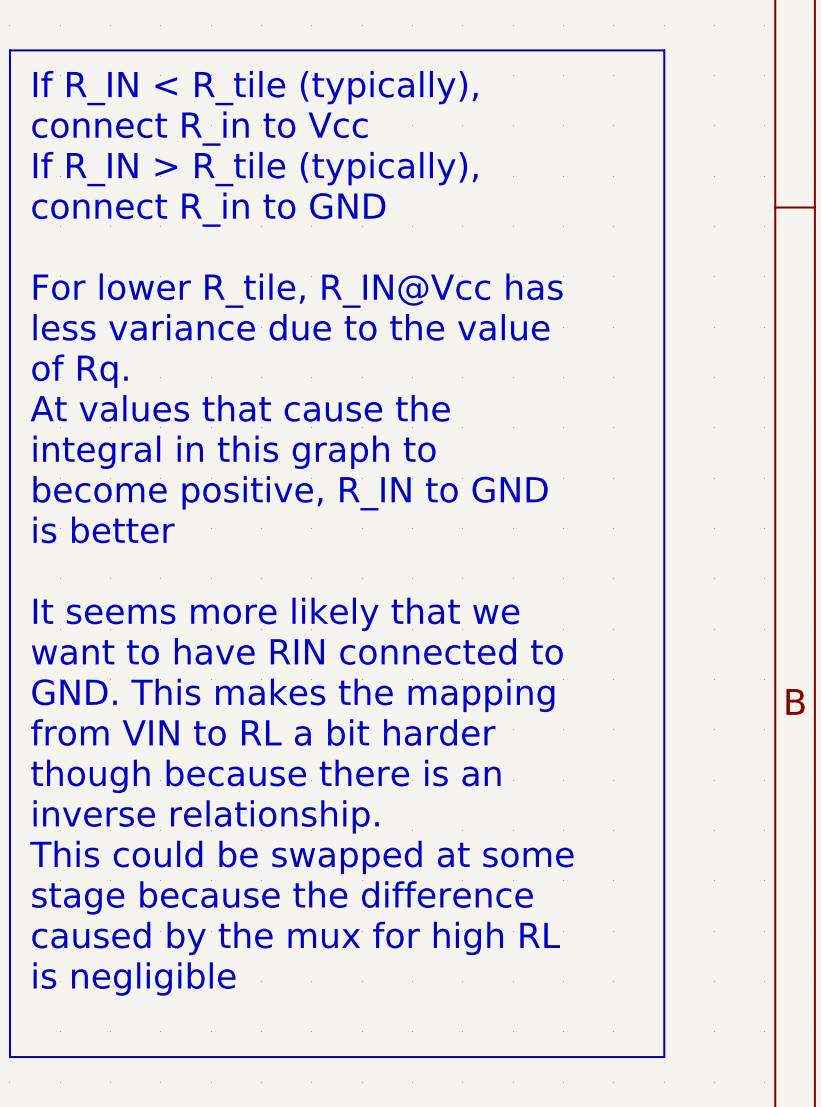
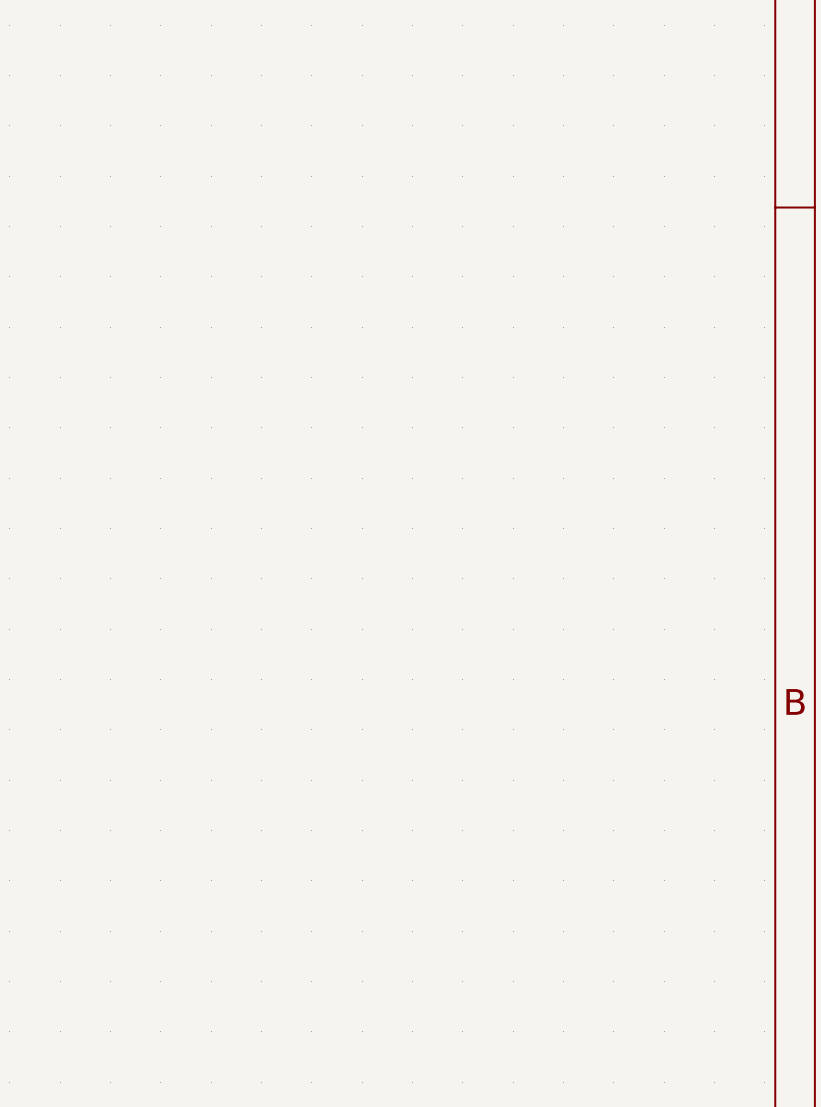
line: (9, 50) (664, 50) (664, 1057) (9, 1057) (9, 50) -> none
text: If R_IN < R_tile (typically), (255, 88) -> none
text: connect R_in to Vcc (199, 128) -> none
text: If R_IN > R_tile (typically), (255, 169) -> none
text: connect R_in to GND (208, 209) -> none
text: For lower R_tile, R_IN@Vcc has (298, 290) -> none
text: less variance due to the value (291, 327) -> none
text: of Rq. (80, 371) -> none
text: At values that cause the (240, 408) -> none
text: integral in this graph to (234, 452) -> none
text: become positive, R_IN to GND (290, 493) -> none
text: is better (104, 529) -> none
text: It seems more likely that we (276, 614) -> none
text: want to have RIN connected to (297, 651) -> none
text: GND. This makes the mapping (293, 695) -> none
text: from VIN to RL a bit harder (263, 732) -> none
text: though because there is an (265, 776) -> none
text: inverse relationship. (206, 816) -> none
text: This could be swapped at some (301, 857) -> none
text: stage because the difference (282, 897) -> none
text: caused by the mux for high RL (296, 938) -> none
text: is negligible (134, 978) -> none

